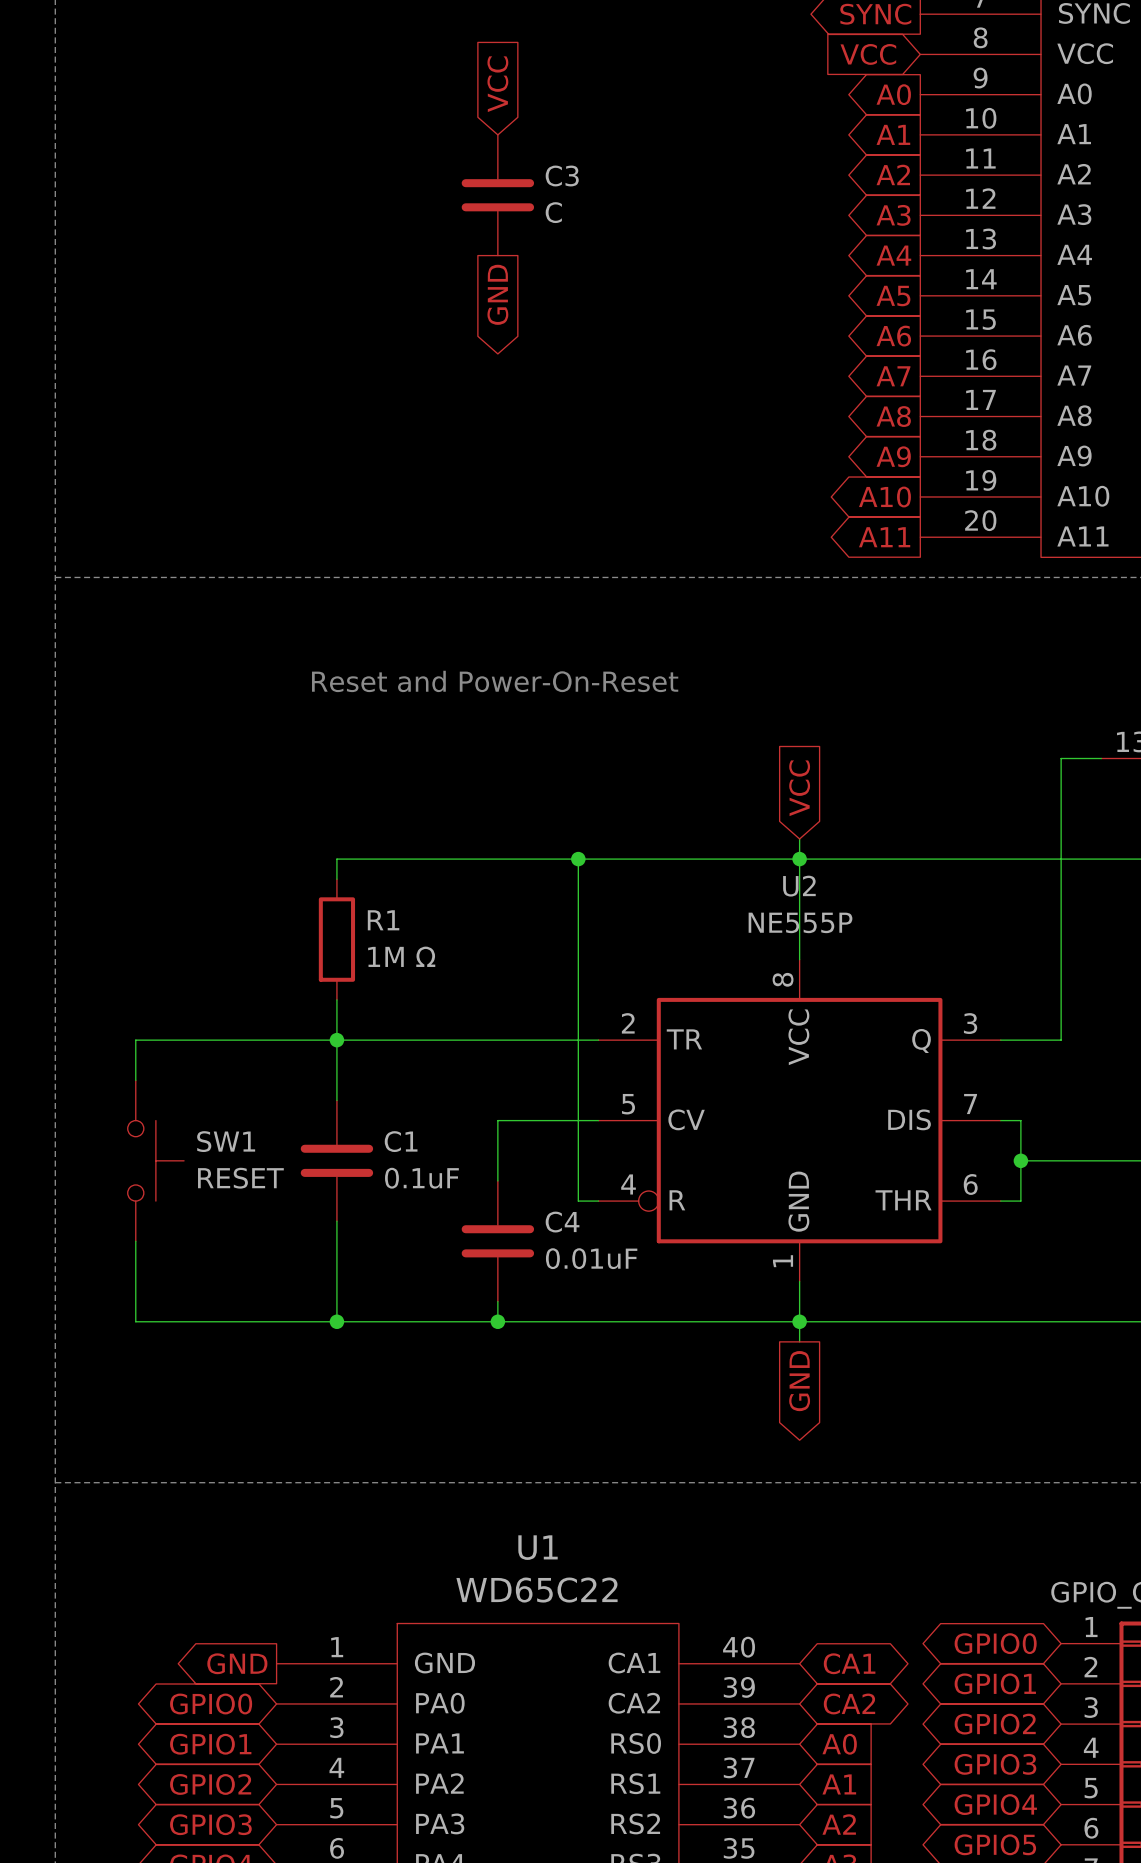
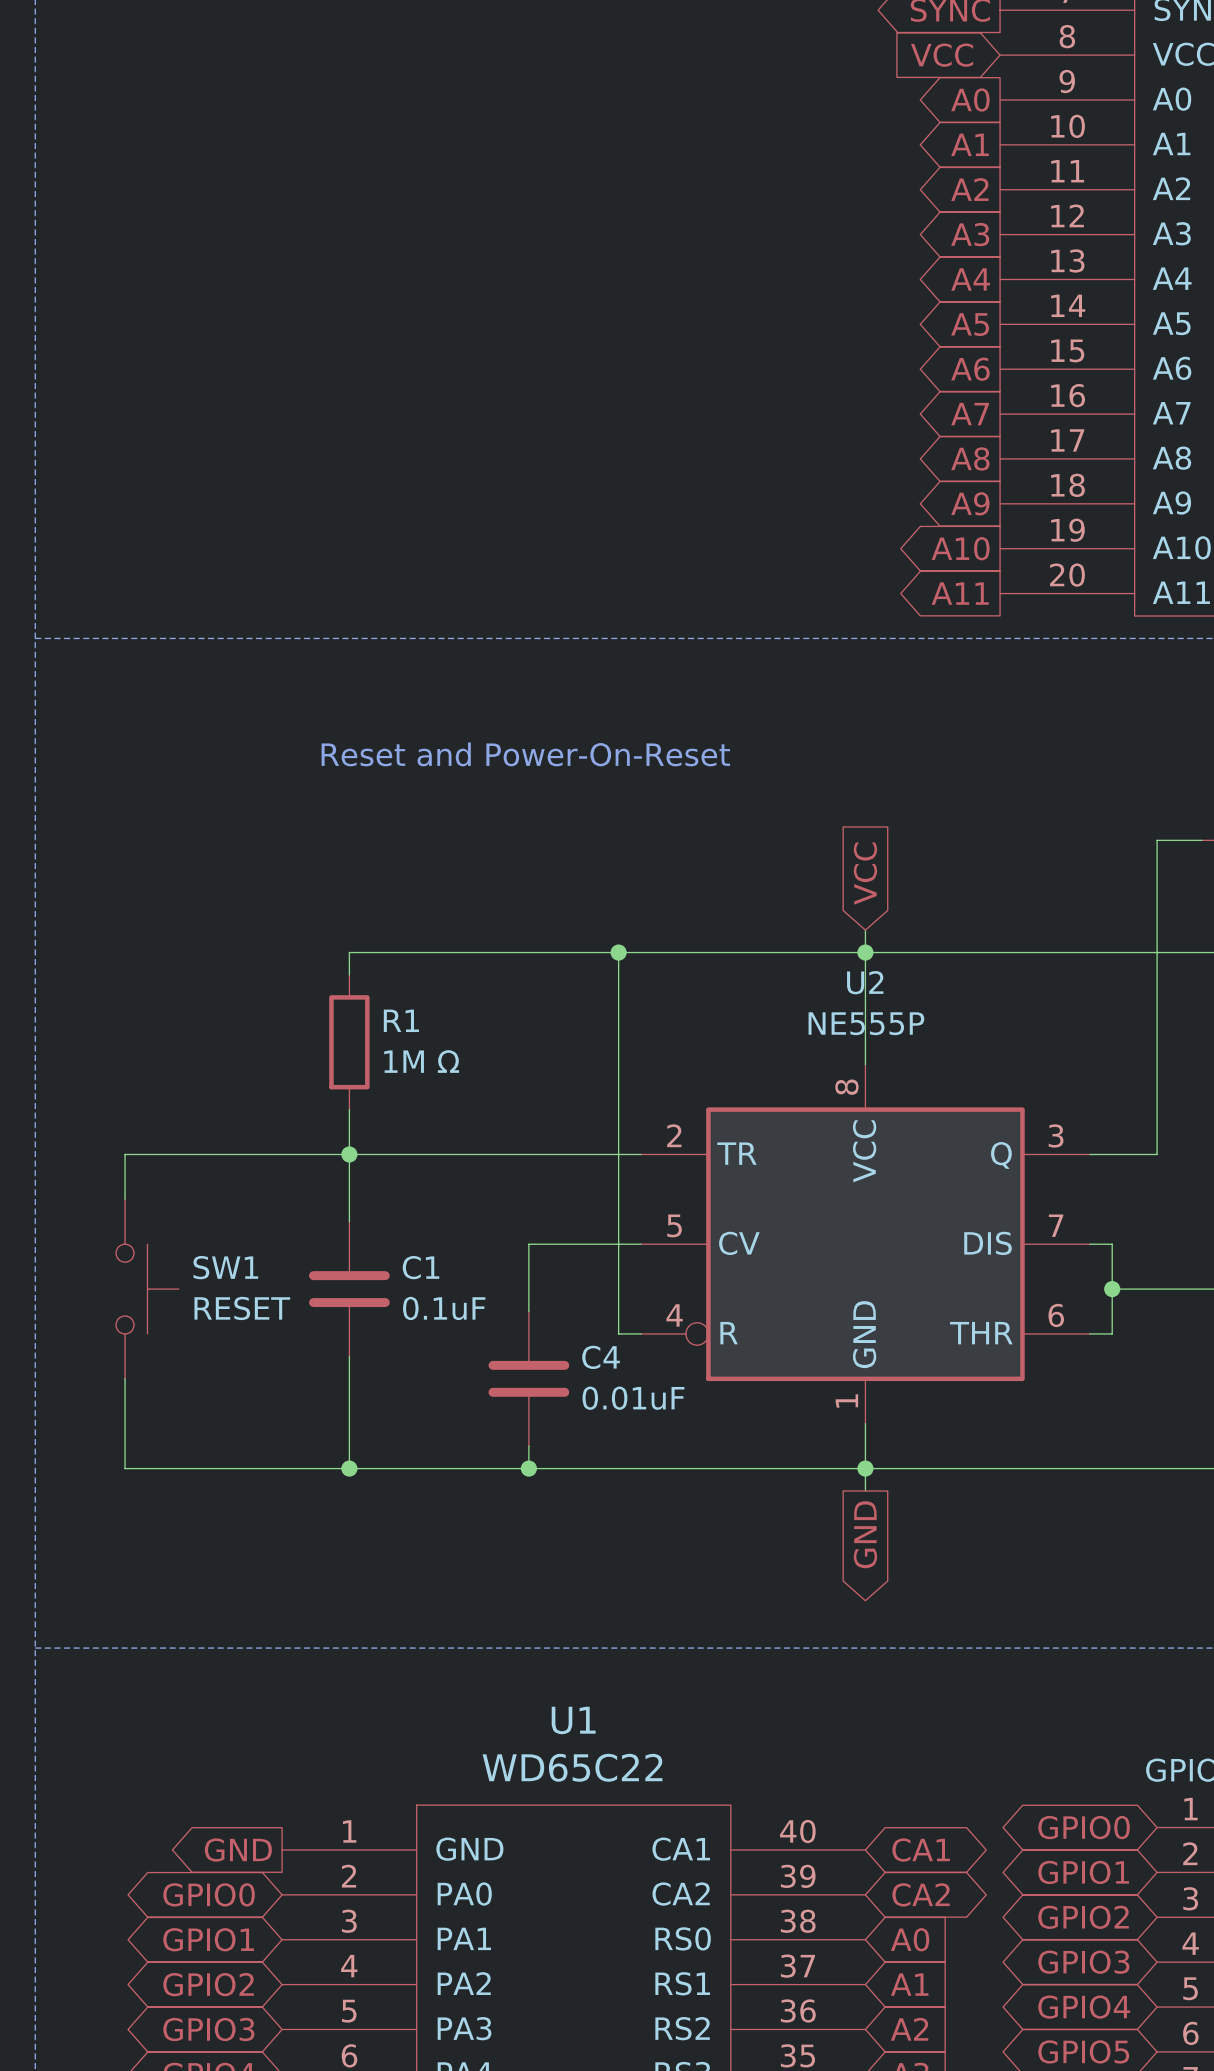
global label: VCC (497, 84) -> none
C3: C (497, 195) -> none
global label: GND (497, 294) -> none

